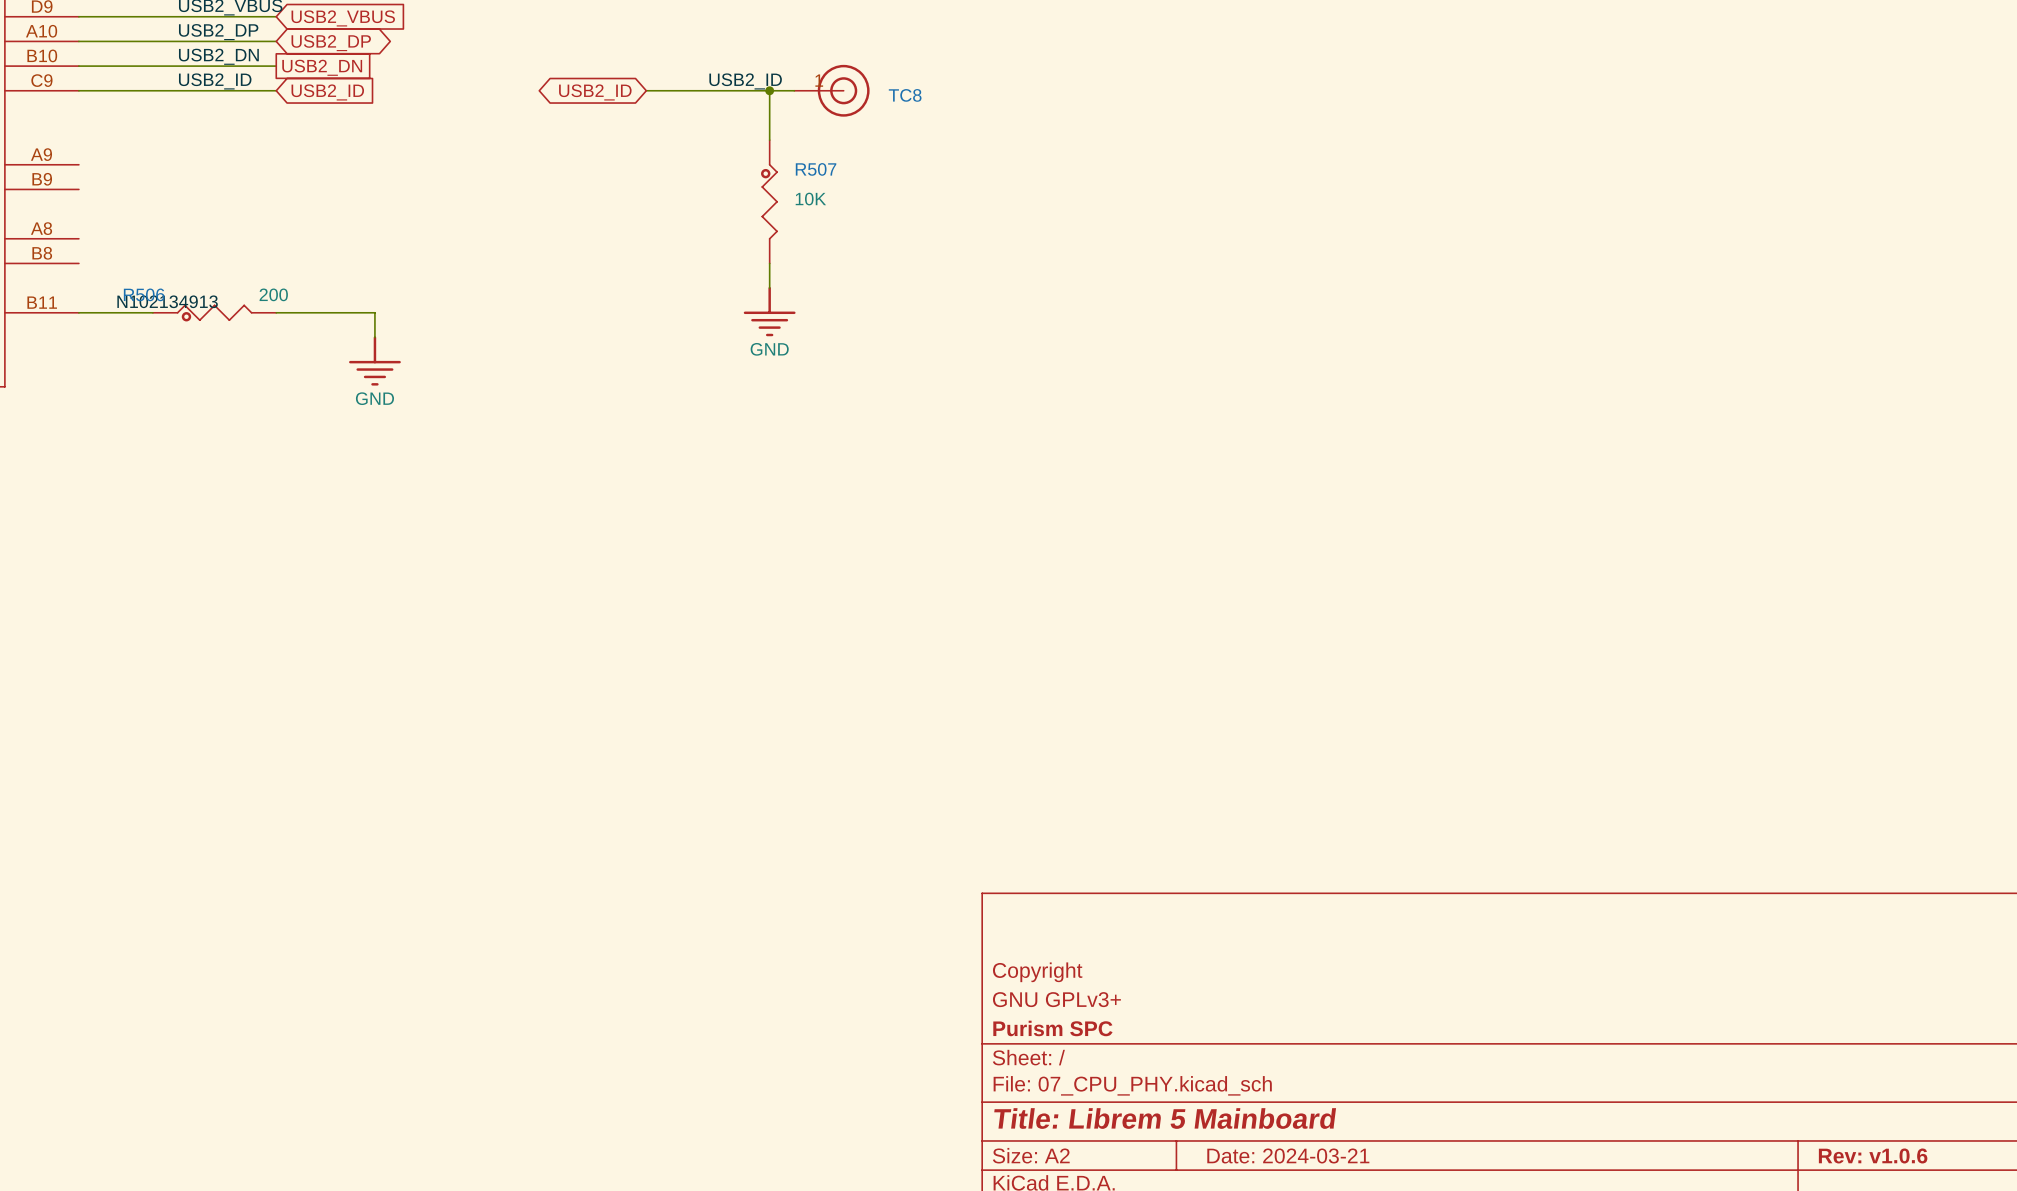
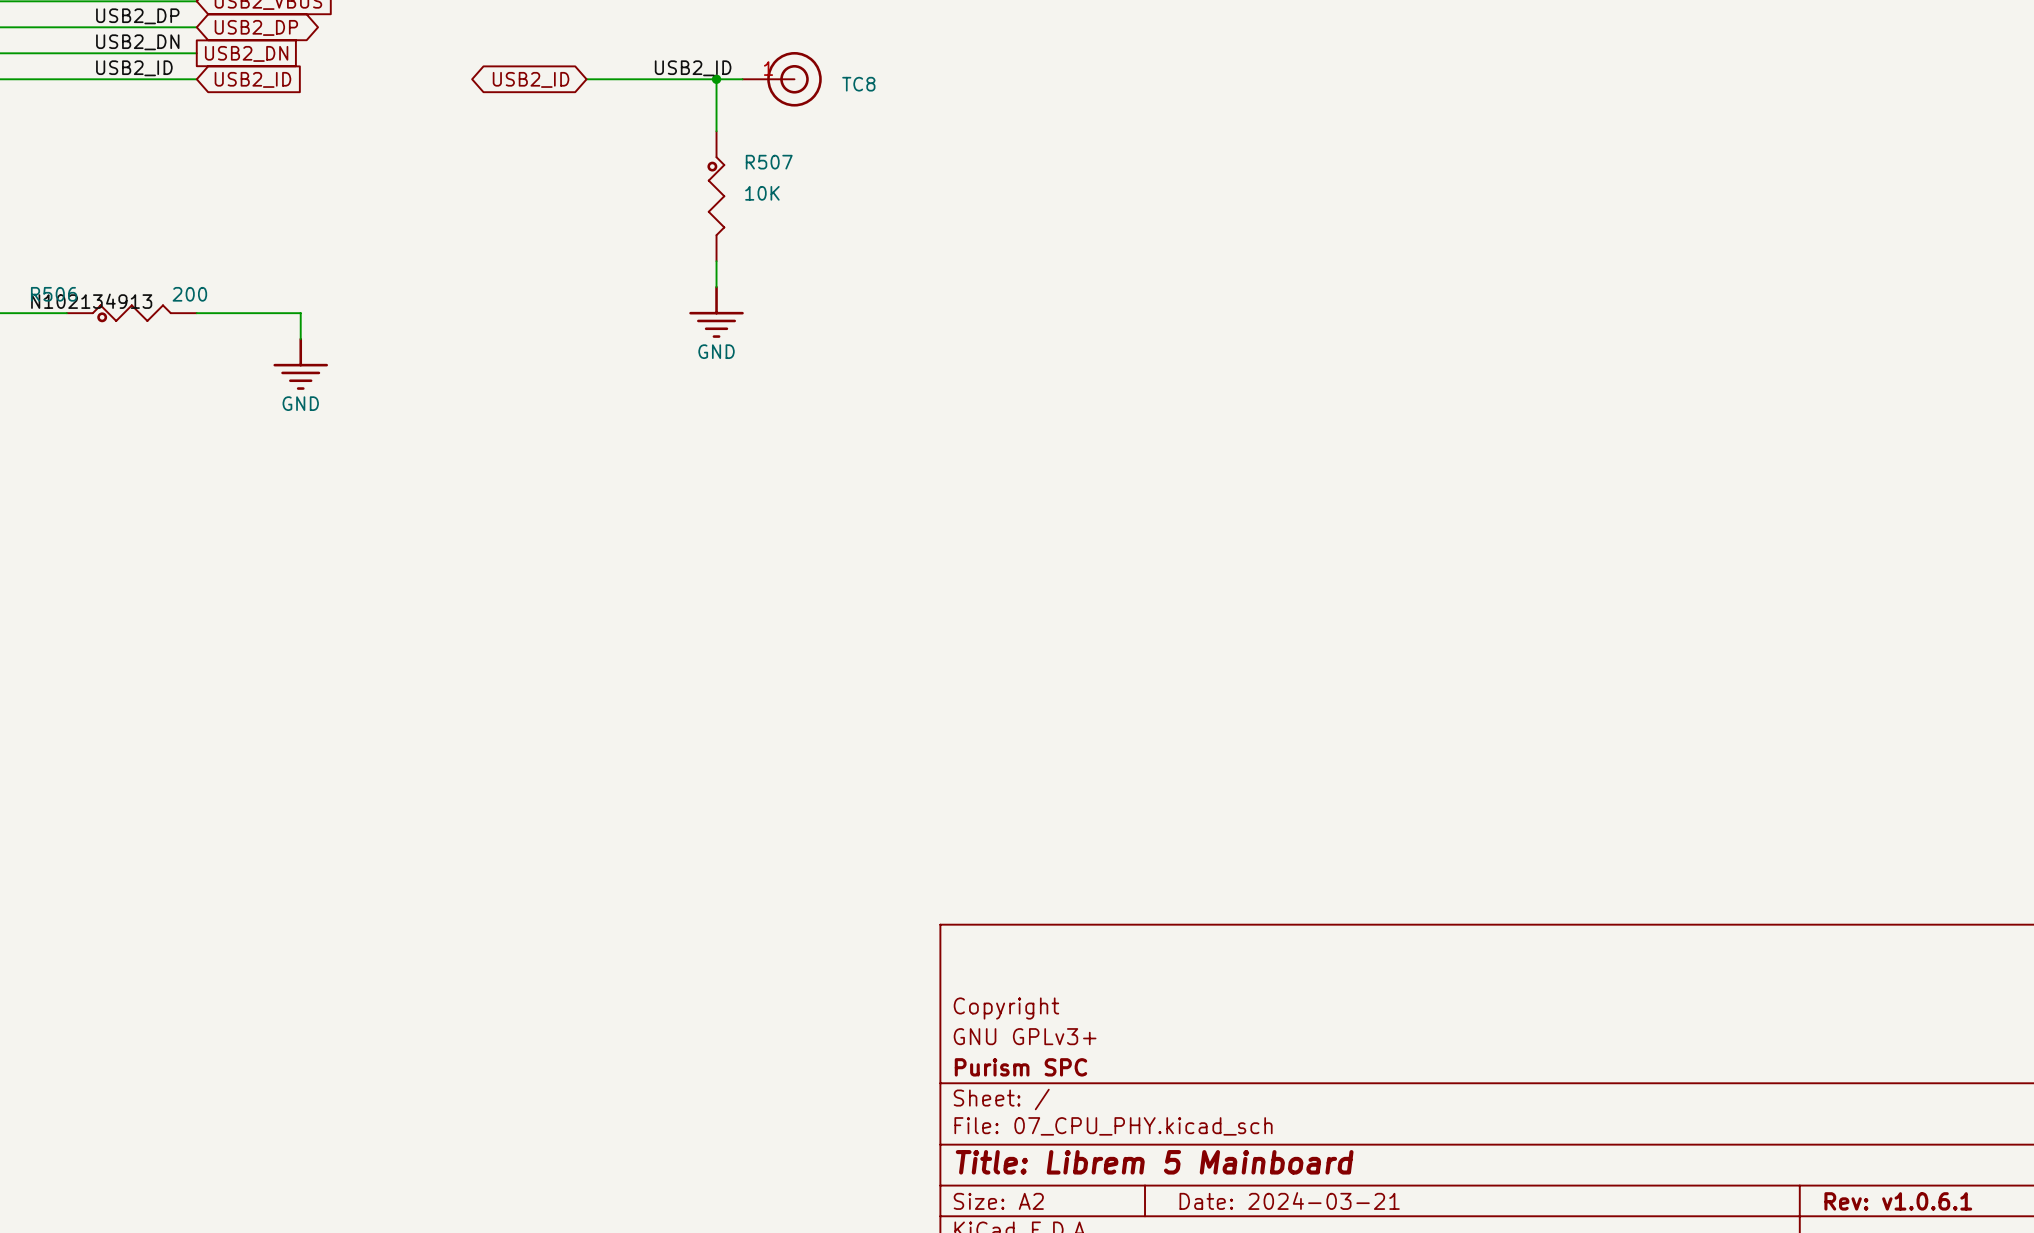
title block: Rev: v1.0.6 (1873, 1155) -> Rev: v1.0.6.1 (1898, 1201)

